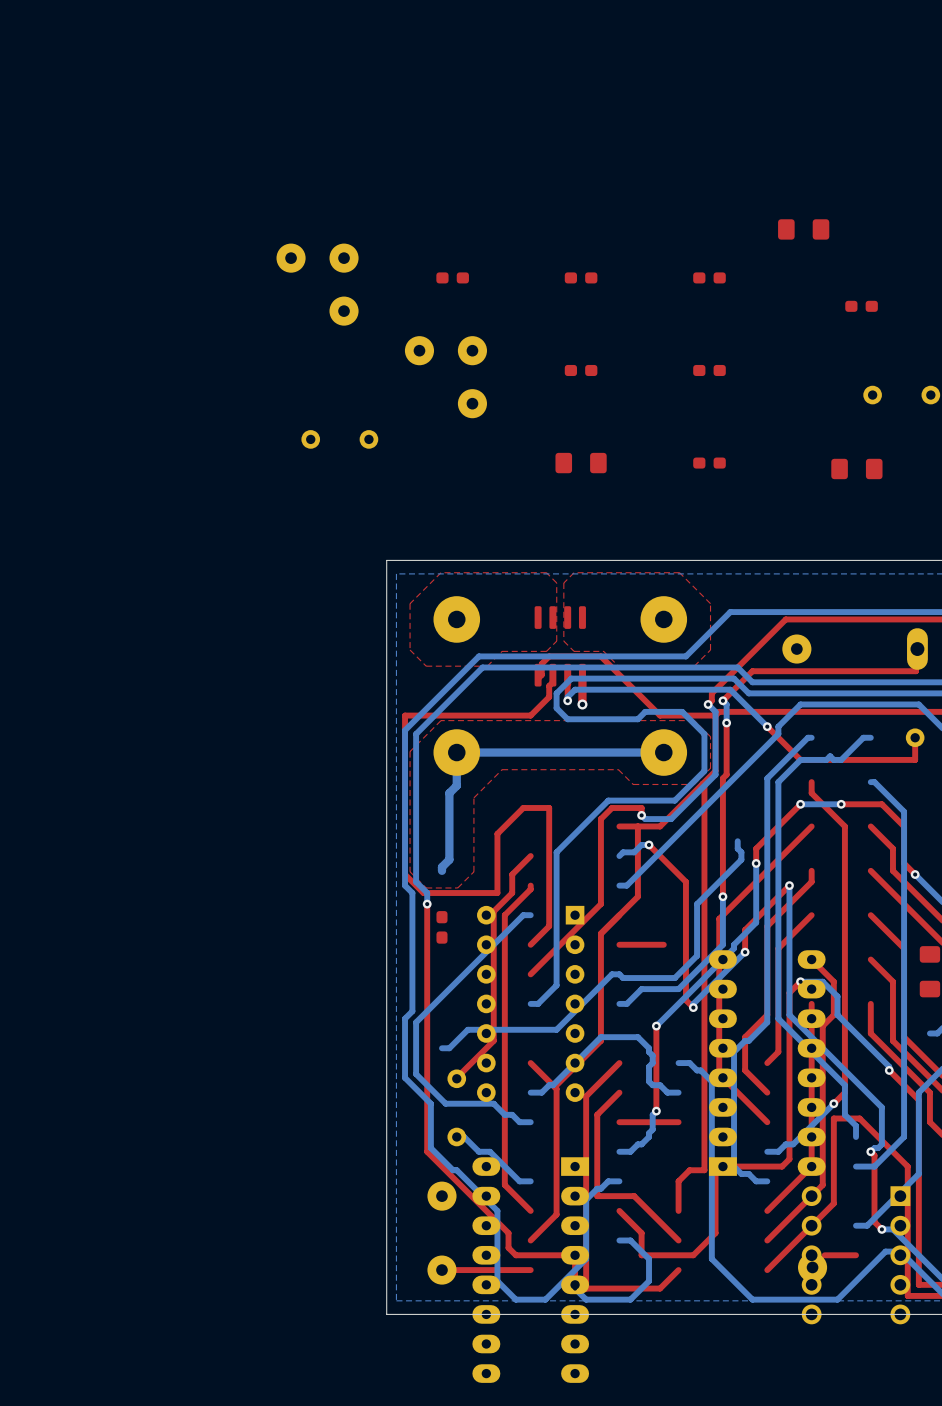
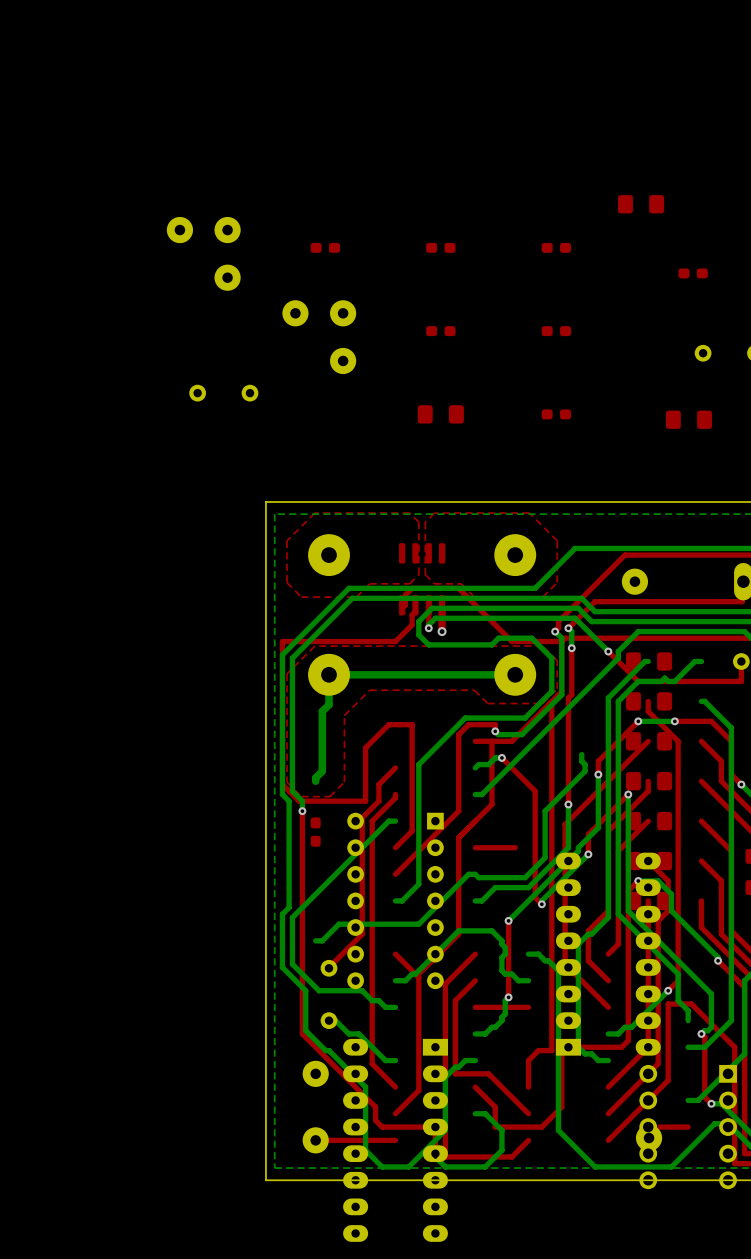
part: none -> (649, 661)
part: none -> (649, 701)
part: none -> (649, 741)
part: none -> (649, 781)
part: none -> (649, 821)
part: none -> (649, 861)
part: none -> (649, 900)

